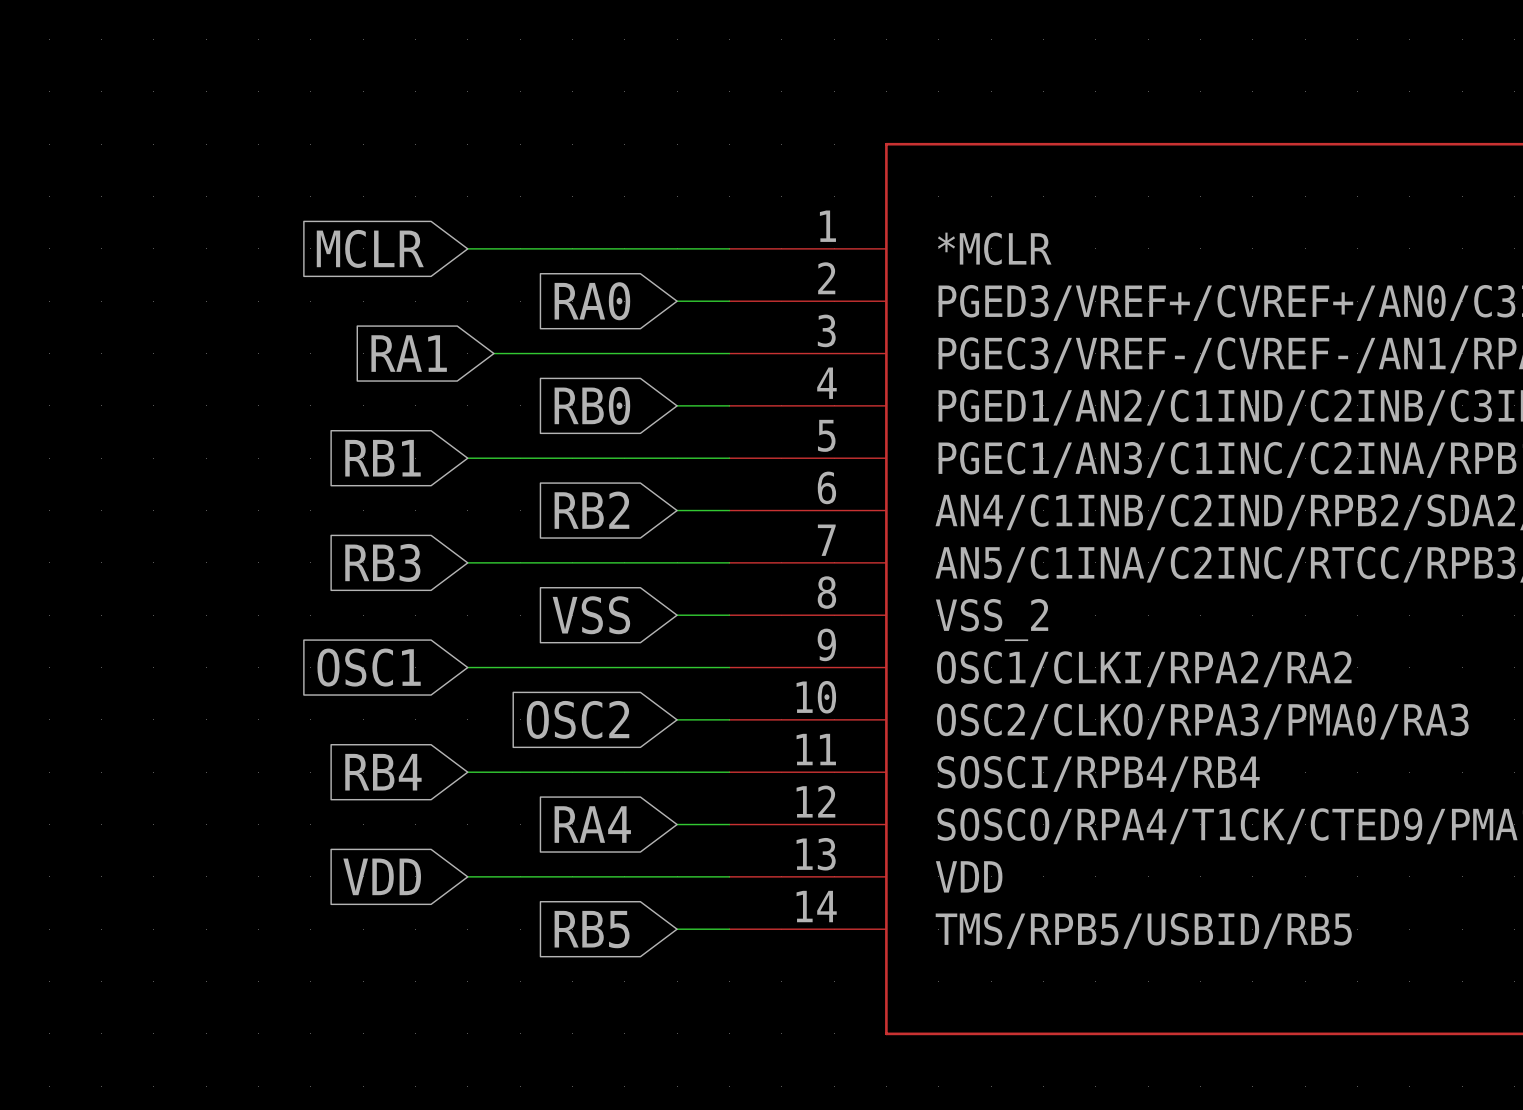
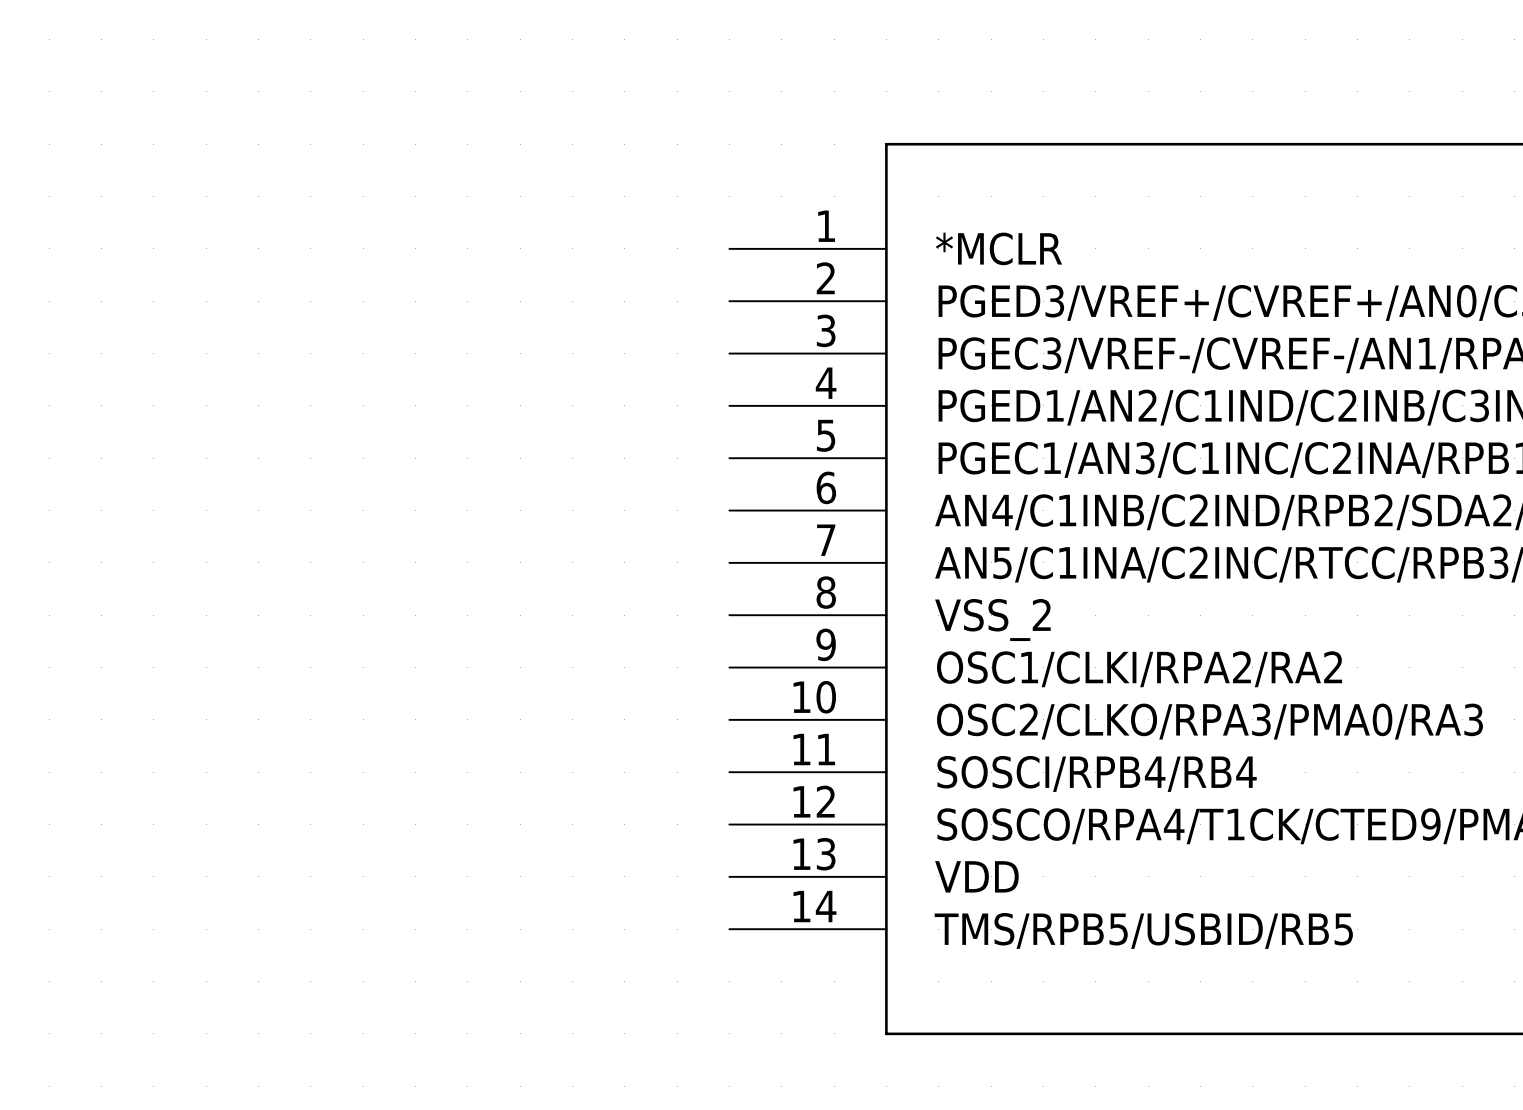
global label: MCLR (370, 248) -> none
wire: (467, 248) (729, 248) -> none
global label: RA0 (592, 301) -> none
wire: (677, 301) (729, 301) -> none
global label: RA1 (409, 353) -> none
wire: (493, 353) (729, 353) -> none
global label: RB0 (592, 405) -> none
wire: (677, 405) (729, 405) -> none
global label: RB1 (382, 458) -> none
wire: (467, 458) (729, 458) -> none
global label: RB2 (591, 510) -> none
wire: (677, 510) (729, 510) -> none
global label: RB3 (382, 562) -> none
wire: (467, 562) (729, 562) -> none
global label: VSS (591, 615) -> none
wire: (677, 615) (729, 615) -> none
global label: OSC1 (369, 667) -> none
wire: (467, 667) (729, 667) -> none
global label: OSC2 (578, 719) -> none
wire: (677, 719) (729, 719) -> none
global label: RB4 (383, 772) -> none
wire: (467, 772) (729, 772) -> none
global label: RA4 (592, 824) -> none
wire: (677, 824) (729, 824) -> none
global label: VDD (382, 876) -> none
wire: (467, 876) (729, 876) -> none
global label: RB5 (592, 929) -> none
wire: (677, 929) (729, 929) -> none

